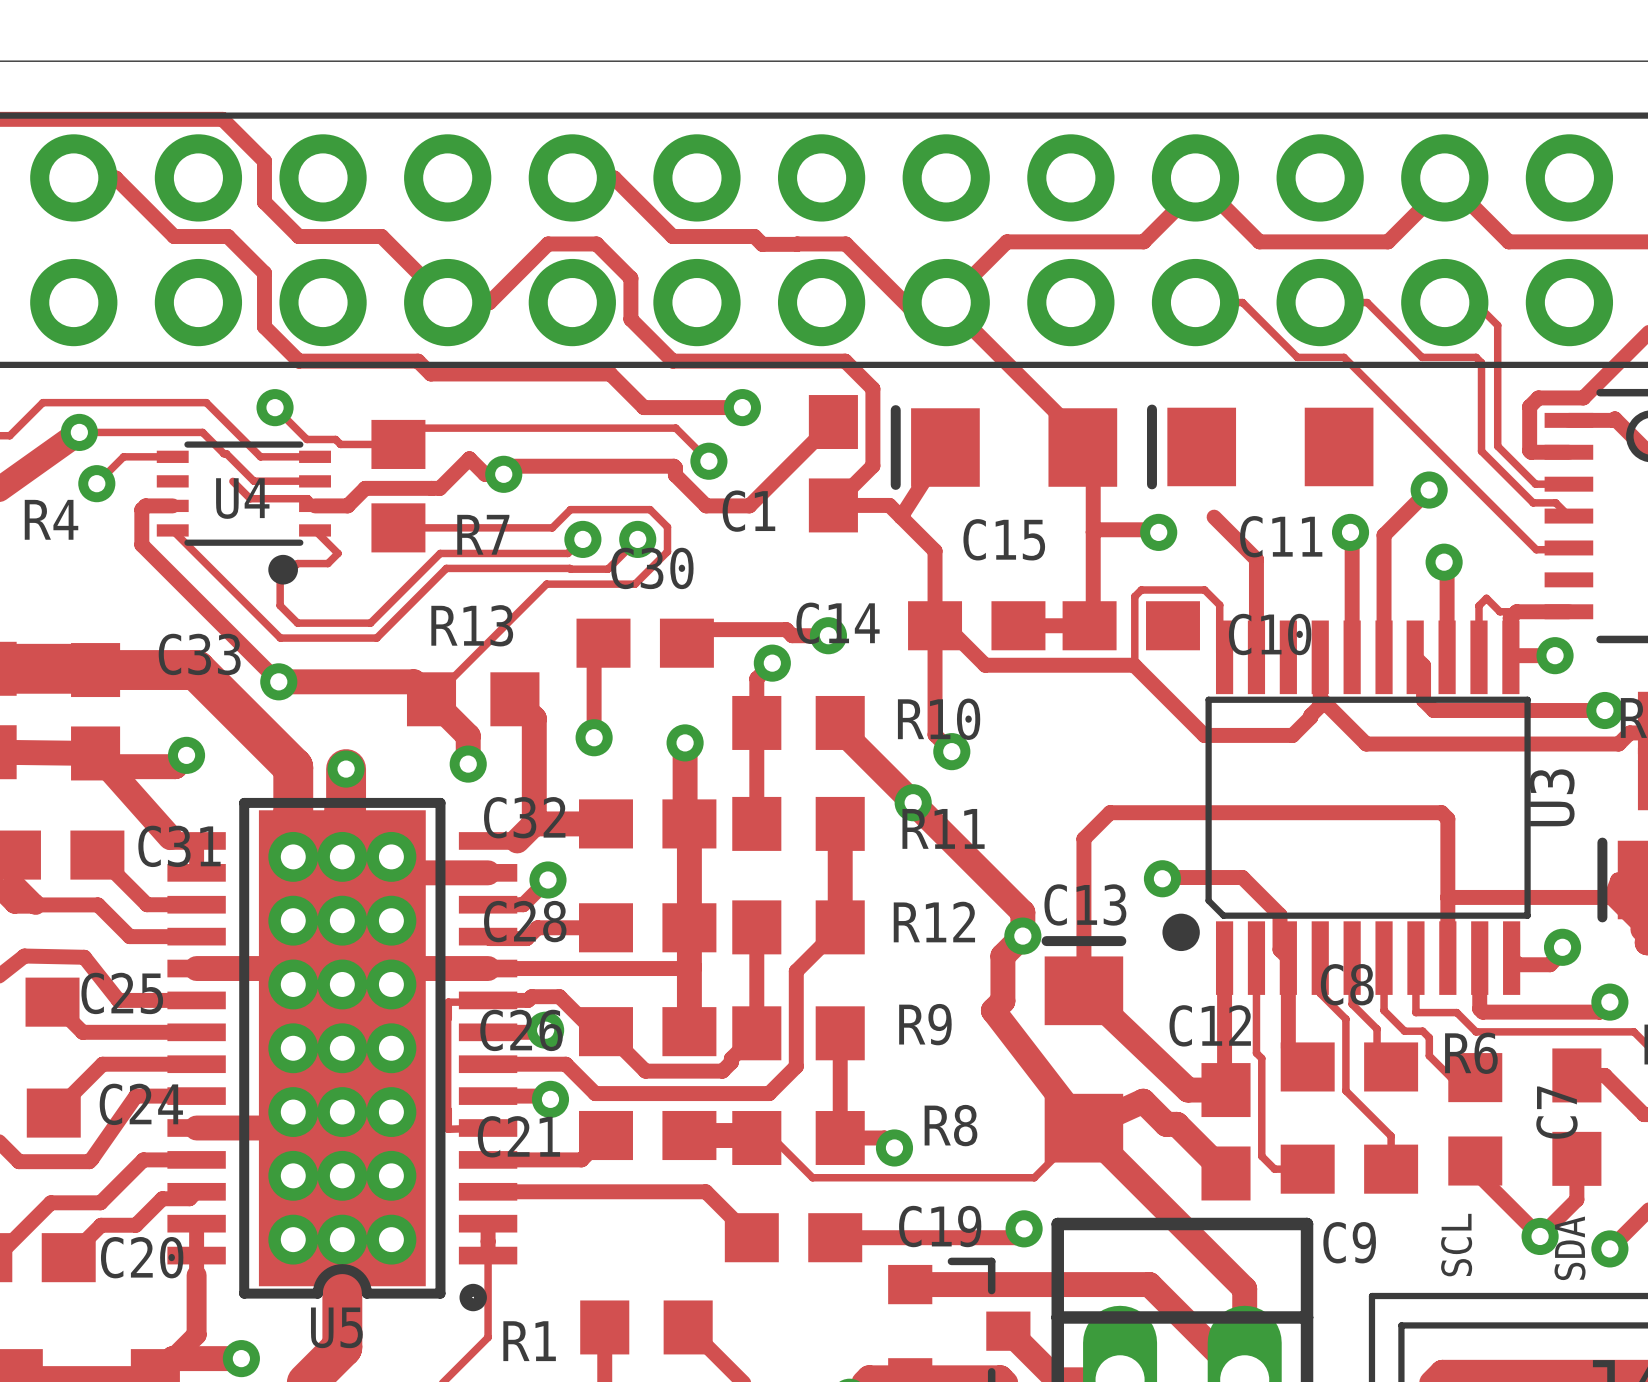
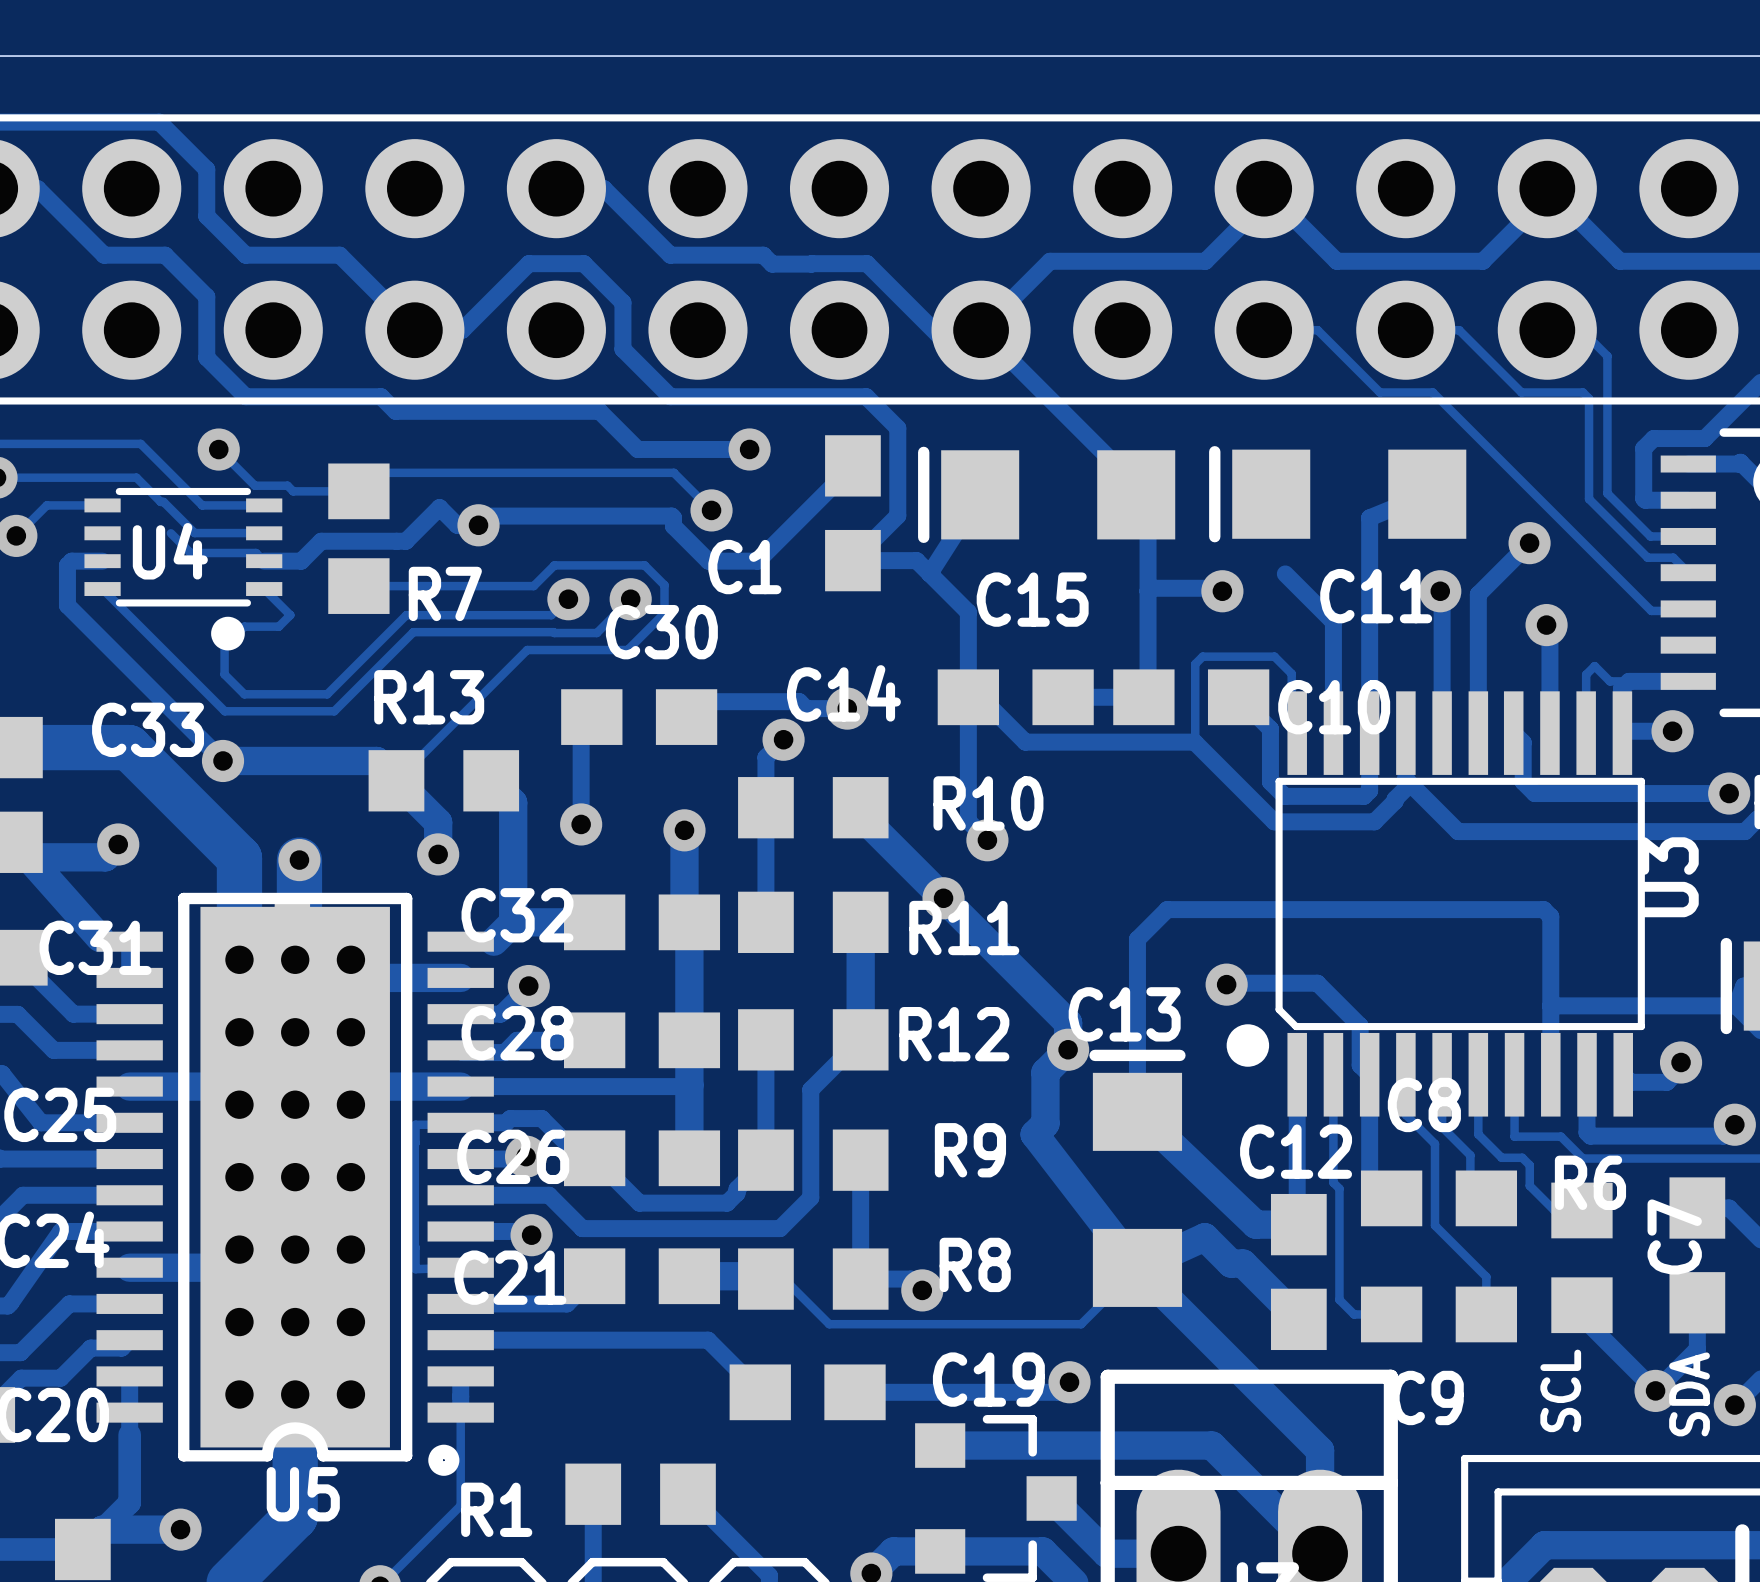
track: none -> (1427, 494) (1369, 517) (1369, 790) (1363, 796) (1284, 796) (1270, 781) (1270, 729) (1238, 697)

